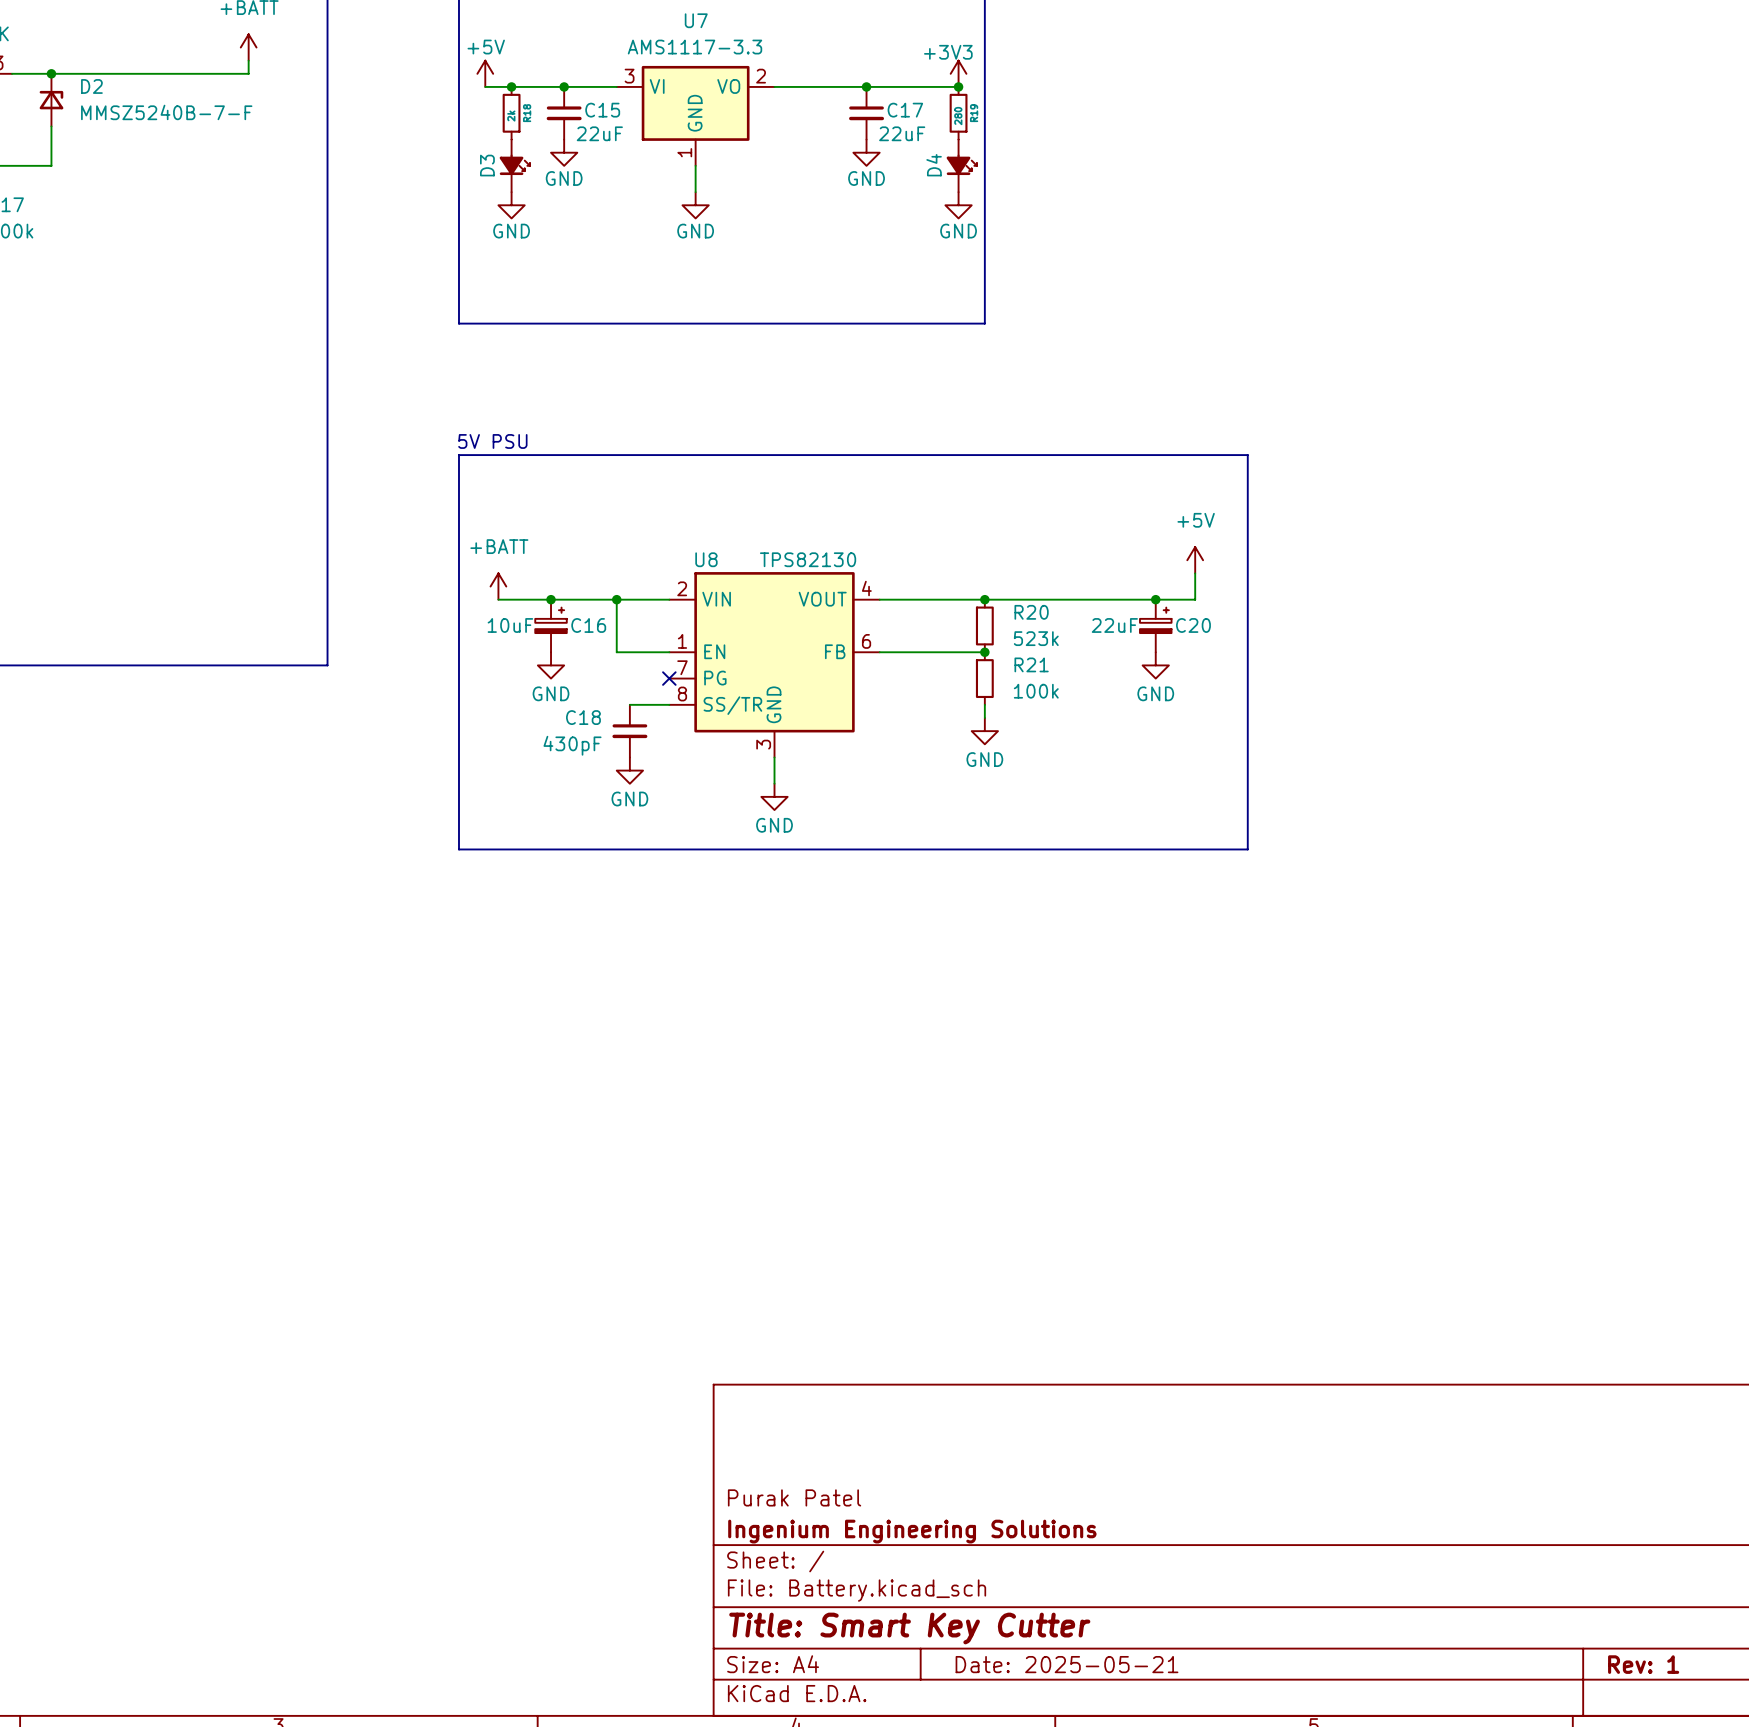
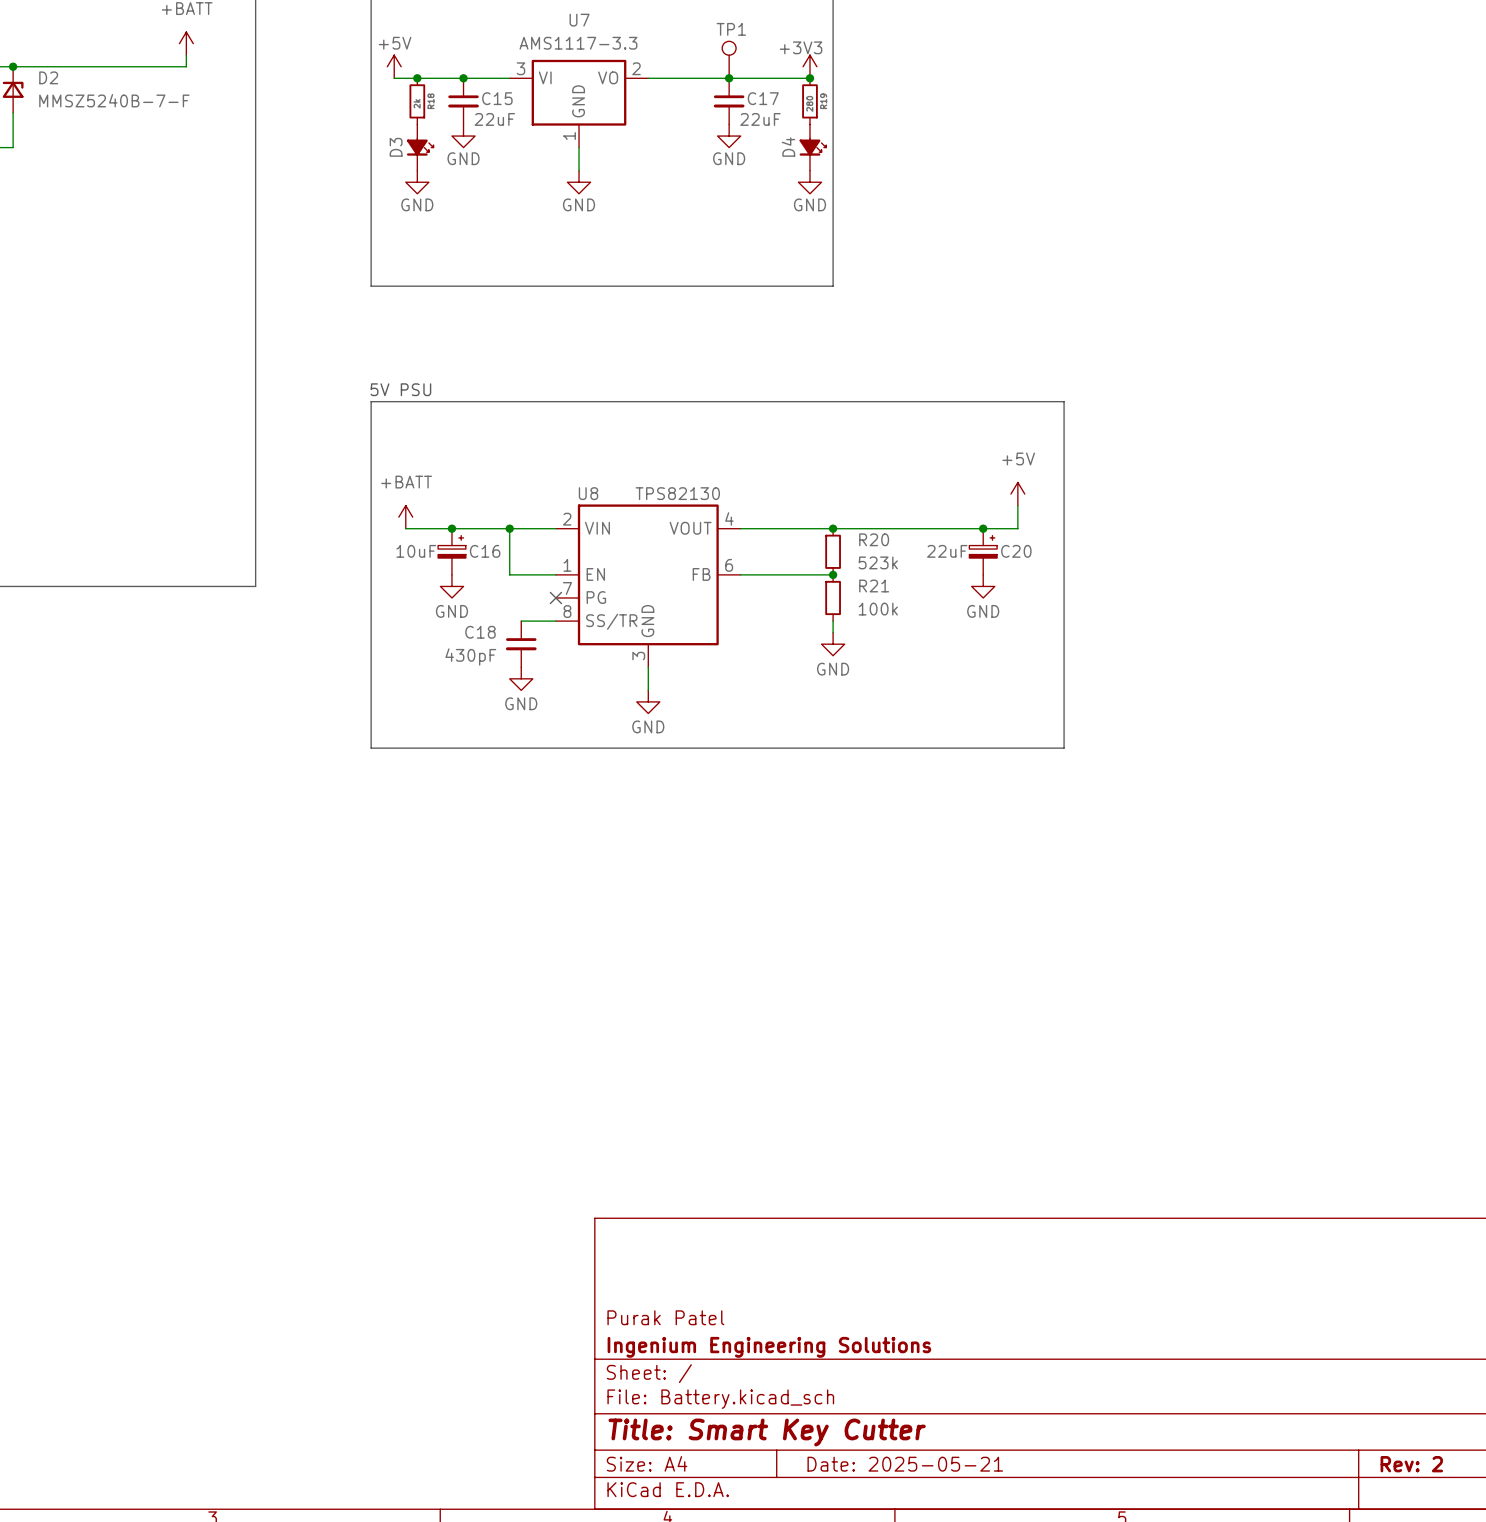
TP1: none -> (729, 59)
title block: Rev: 1 (1643, 1664) -> Rev: 2 (1411, 1464)

